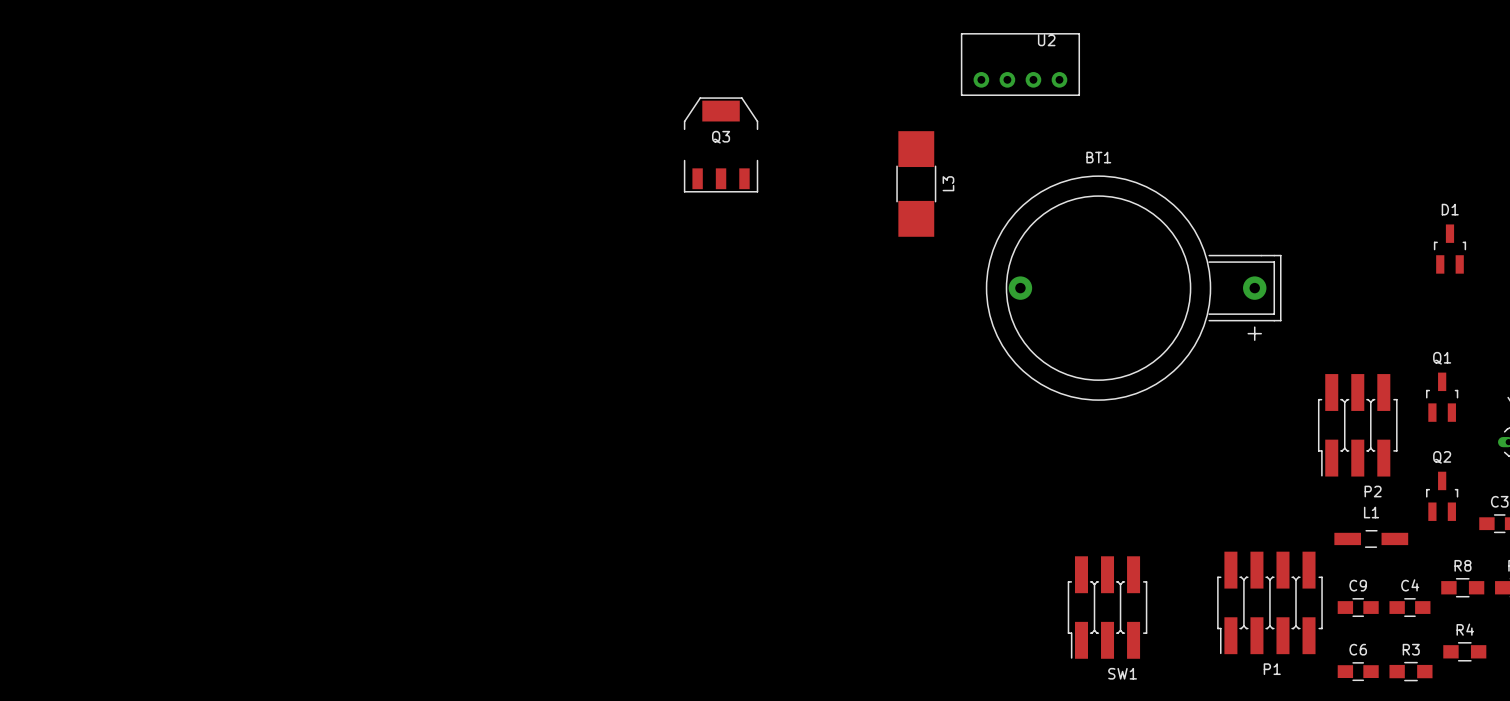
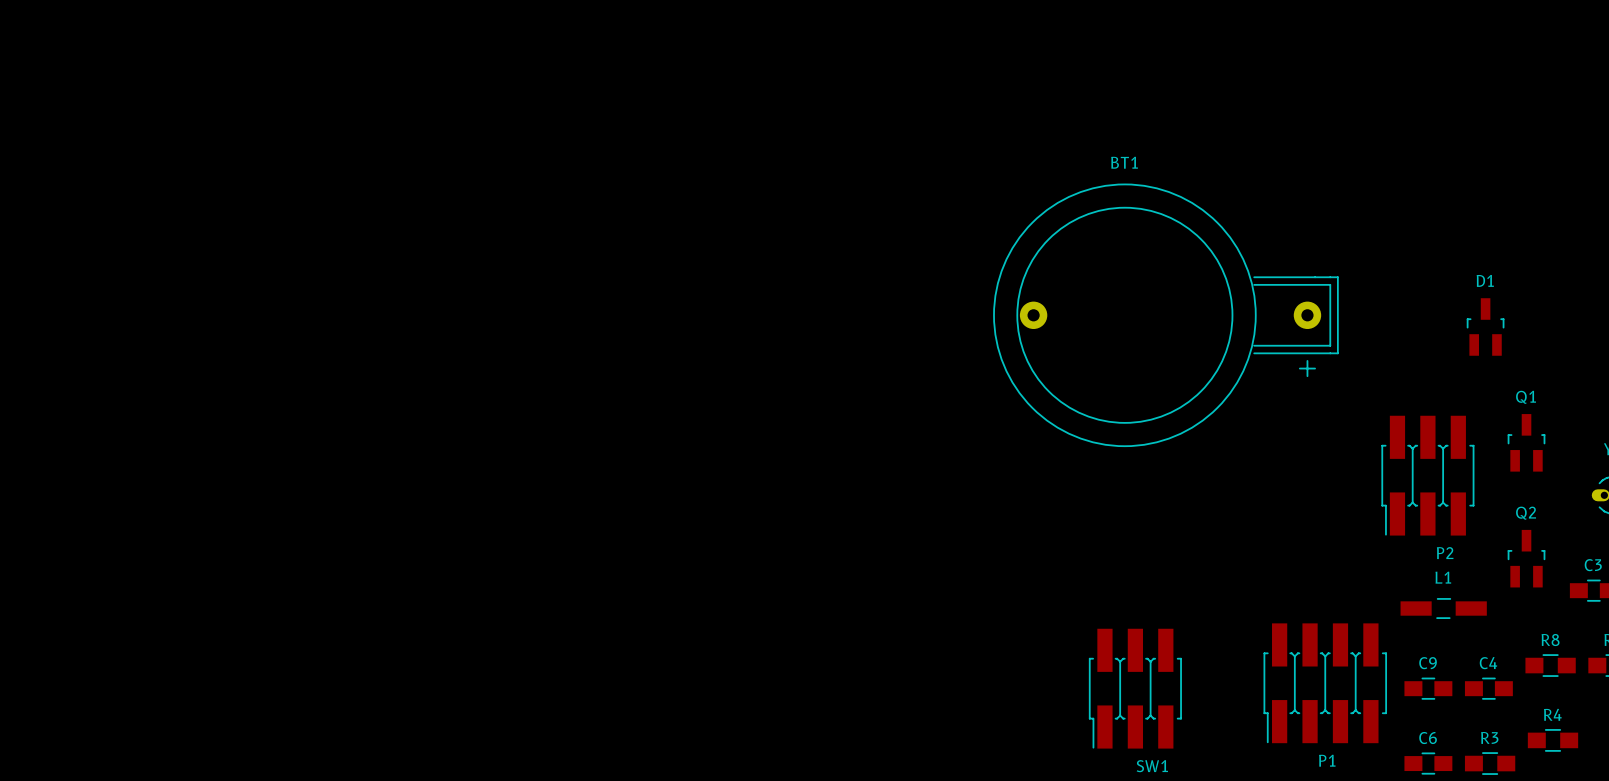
U2: (1020, 64) -> none
Q3: (721, 144) -> none
L3: (916, 183) -> none
D1 position: (1449, 249) -> (1485, 326)

